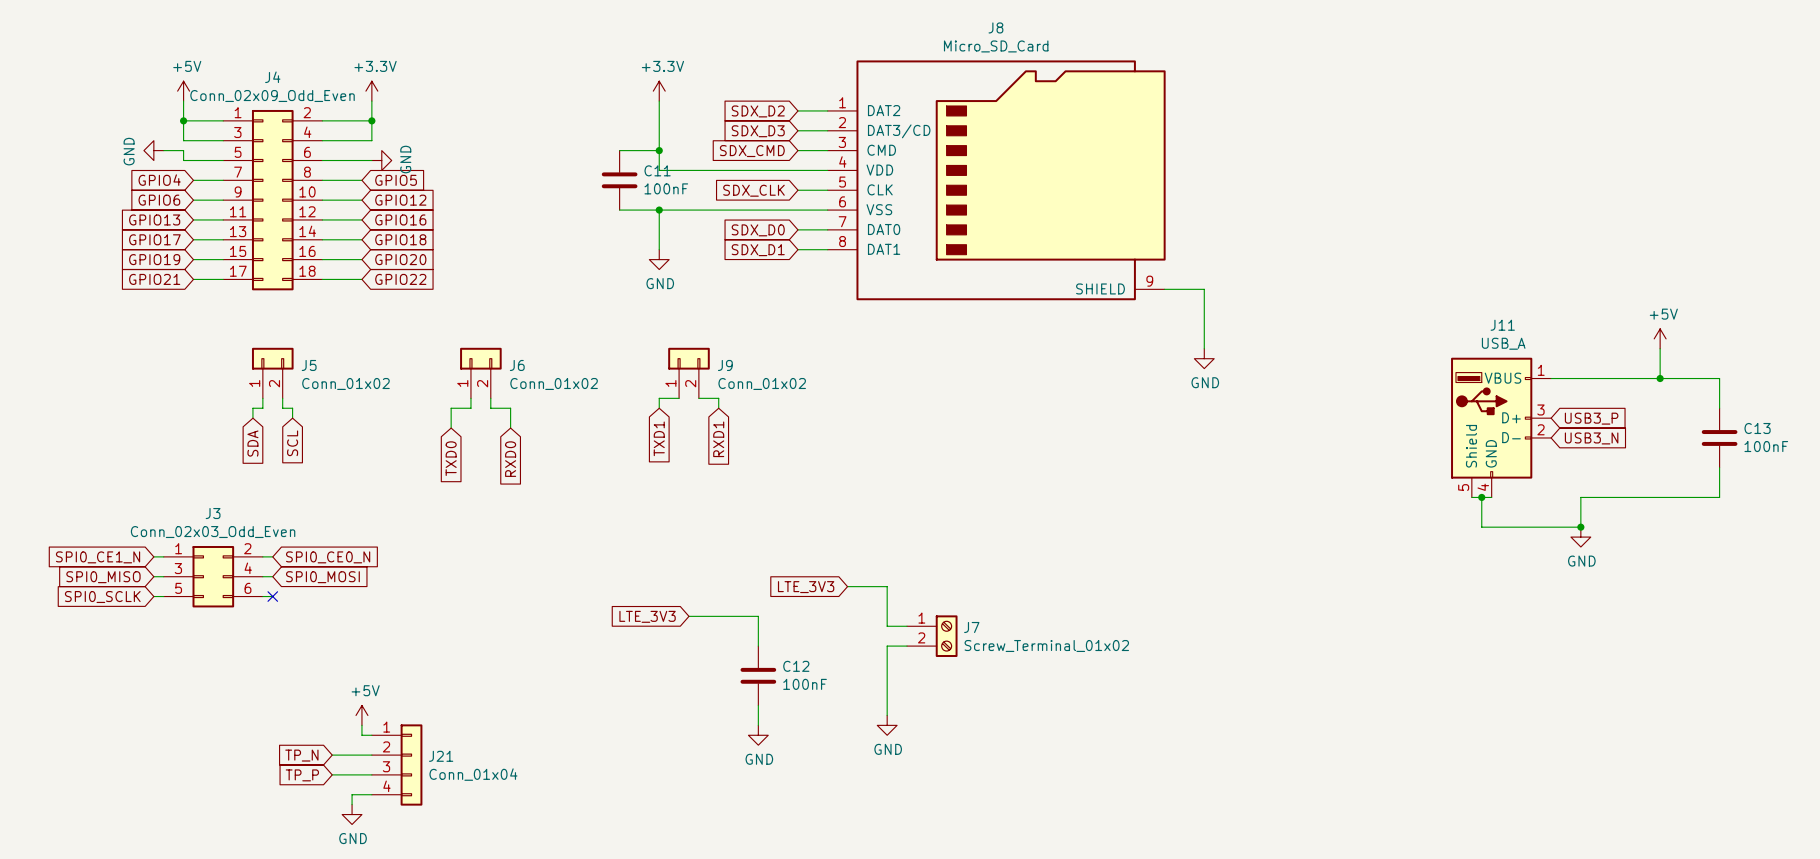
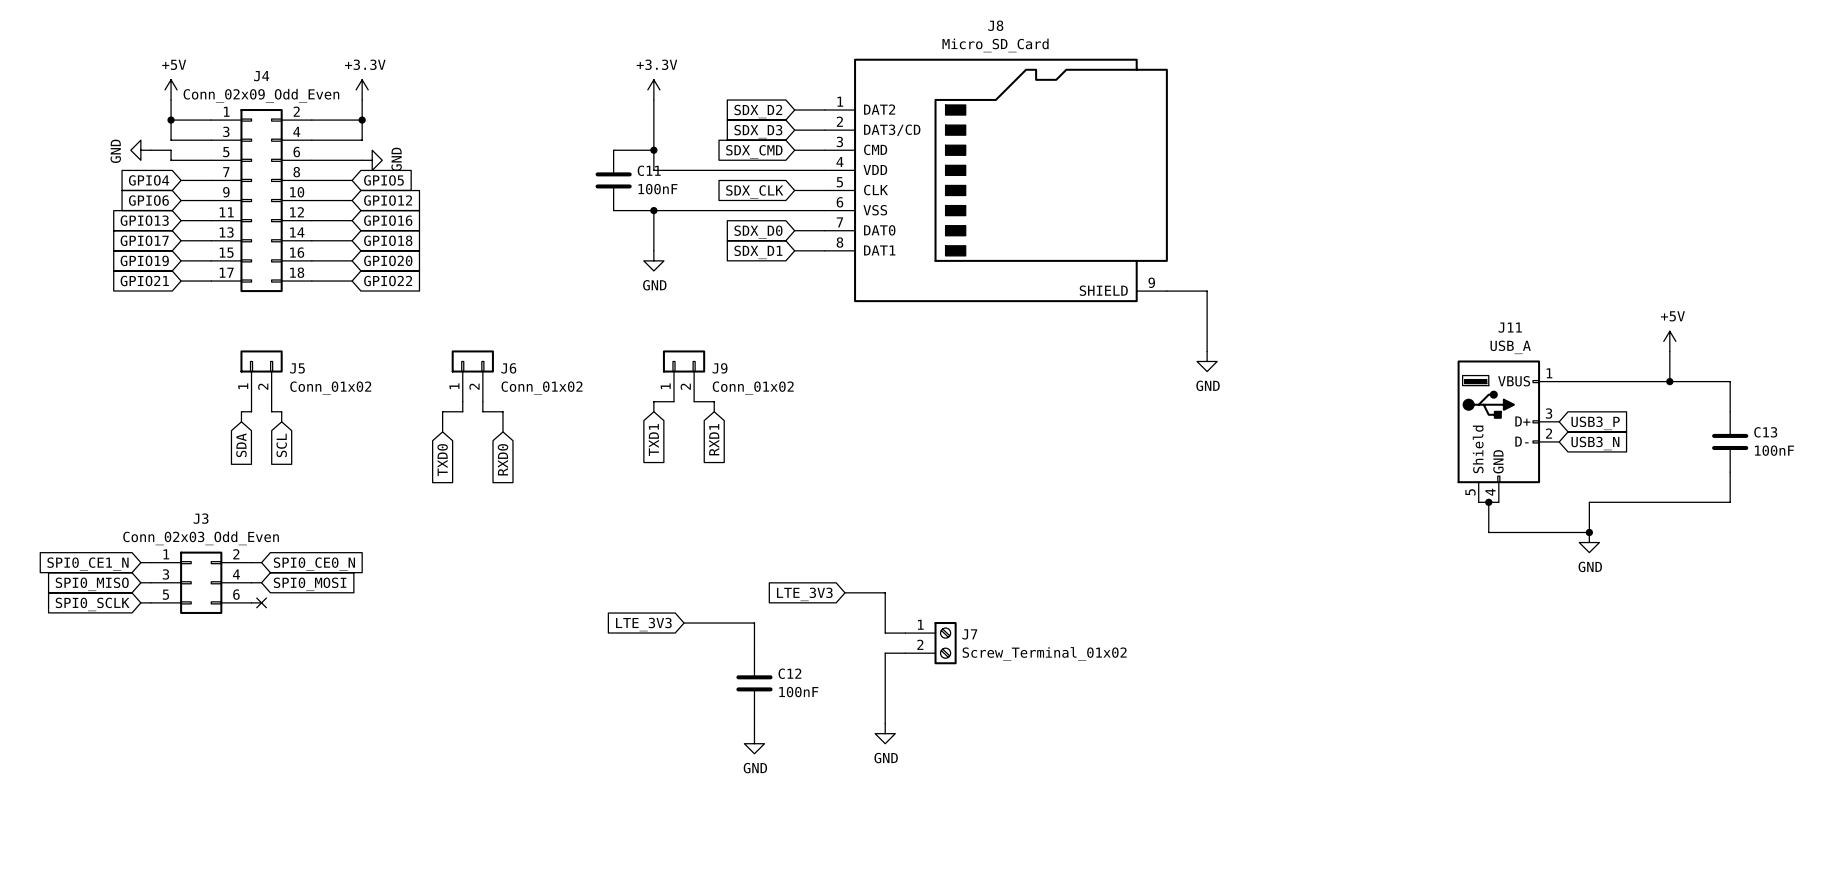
power symbol: +5V (361, 715) -> none
wire: (361, 725) (361, 735) (371, 735) -> none
global label: TP_N (301, 755) -> none
wire: (332, 755) (371, 755) -> none
J21: Conn_01x04 (397, 765) -> none
wire: (332, 774) (371, 774) -> none
global label: TP_P (302, 775) -> none
wire: (371, 794) (352, 794) (352, 804) -> none
power symbol: GND (352, 814) -> none

